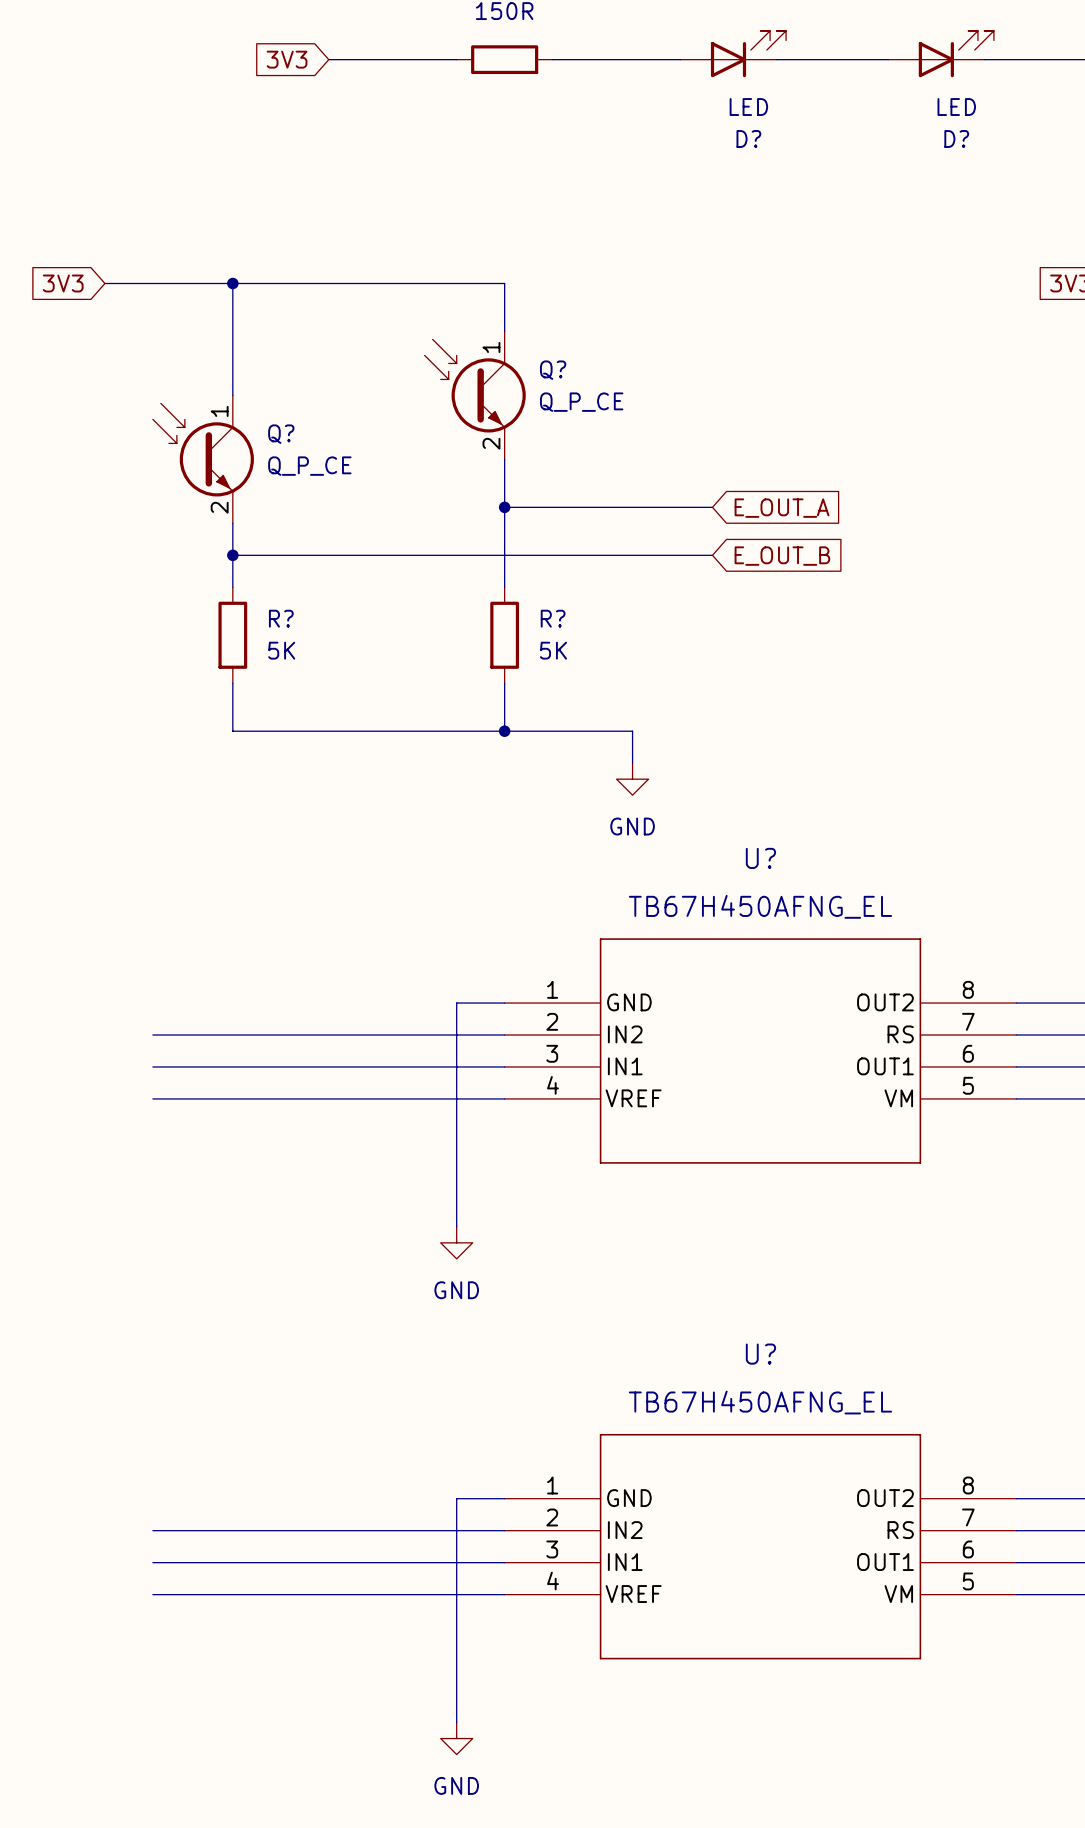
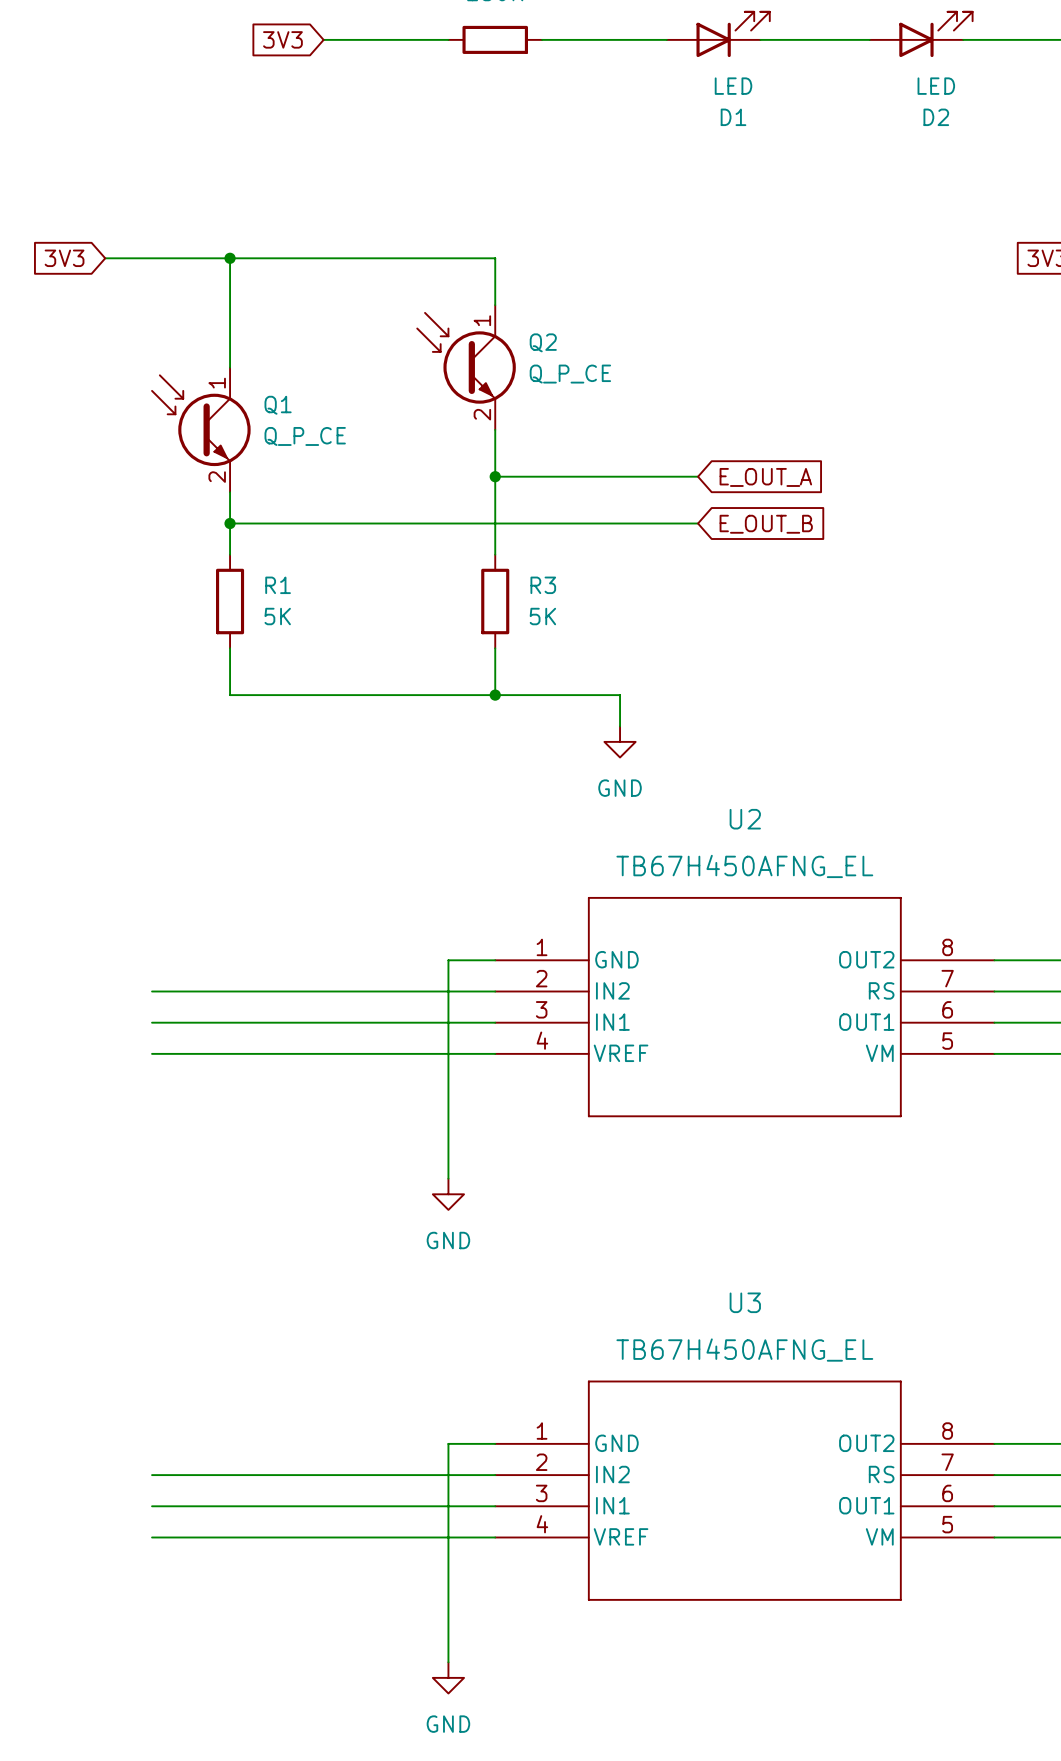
D? name: D? (748, 139) -> D1 (733, 117)
D? name: D? (956, 139) -> D2 (936, 117)
Q? name: Q? (553, 370) -> Q2 (543, 342)
Q? name: Q? (281, 434) -> Q1 (278, 405)
R? name: R? (281, 618) -> R1 (278, 585)
R? name: R? (553, 618) -> R3 (543, 585)
U? name: U? (760, 858) -> U2 (745, 819)
U? name: U? (760, 1354) -> U3 (745, 1302)

